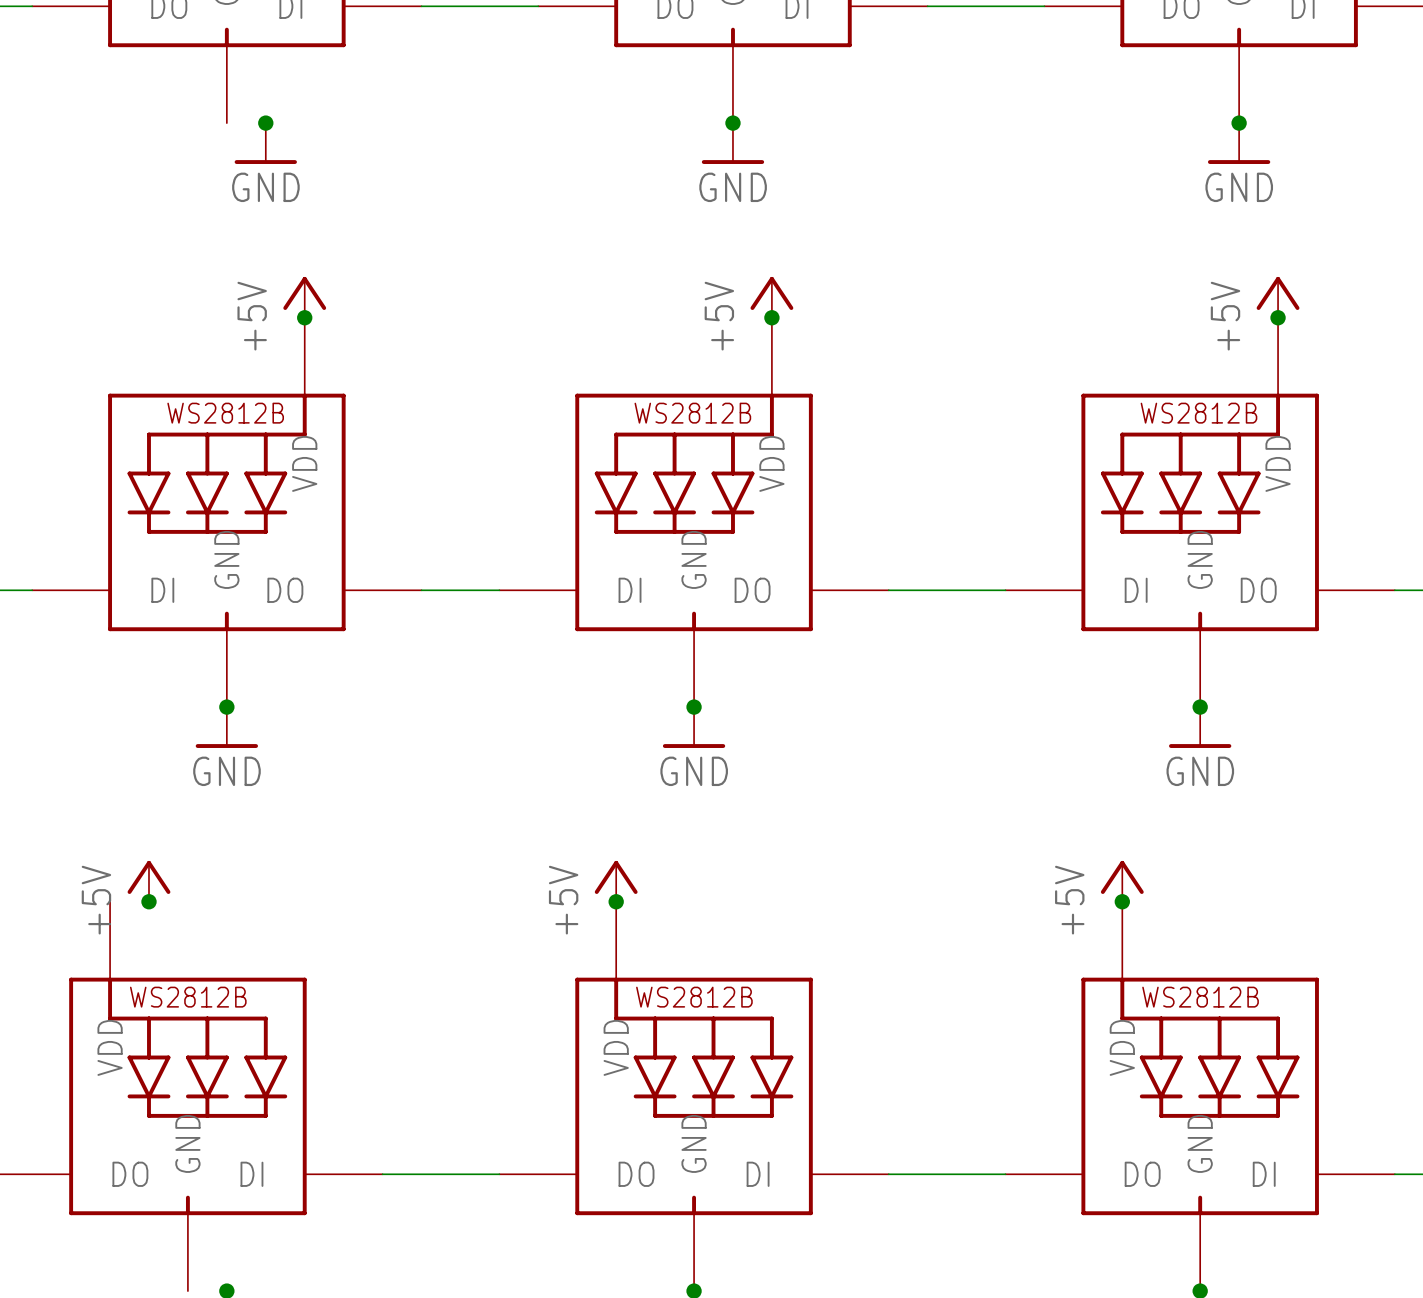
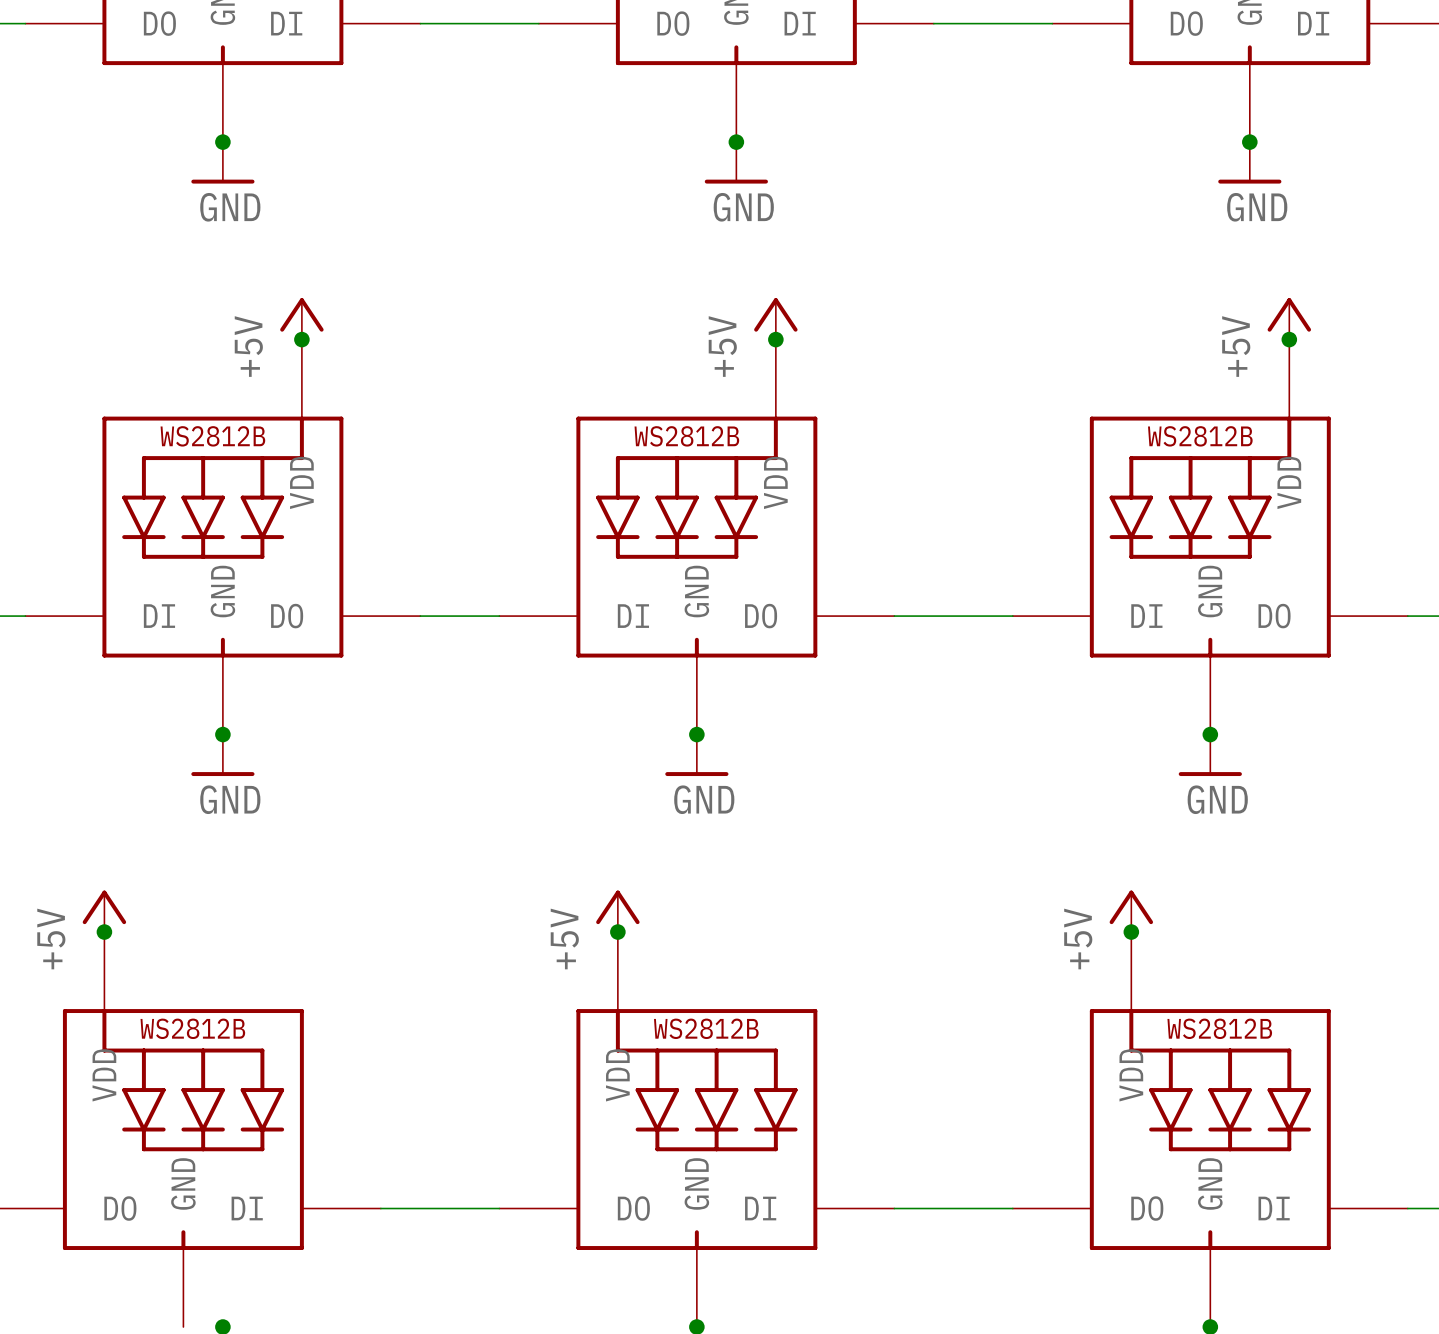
junction position: (265, 123) -> (222, 142)
power symbol position: GND (265, 143) -> GND (222, 162)
power symbol position: +5V (148, 881) -> +5V (104, 911)
junction position: (148, 901) -> (104, 932)

